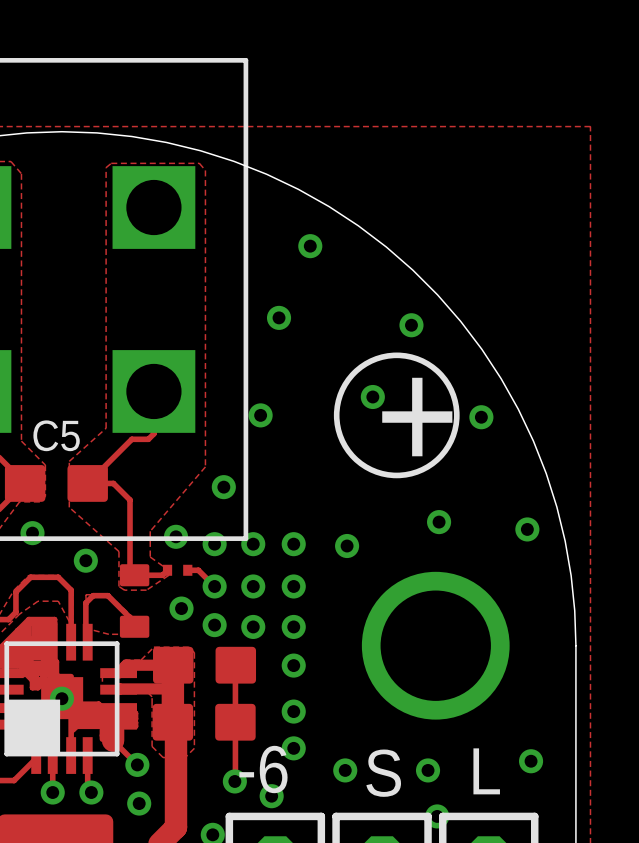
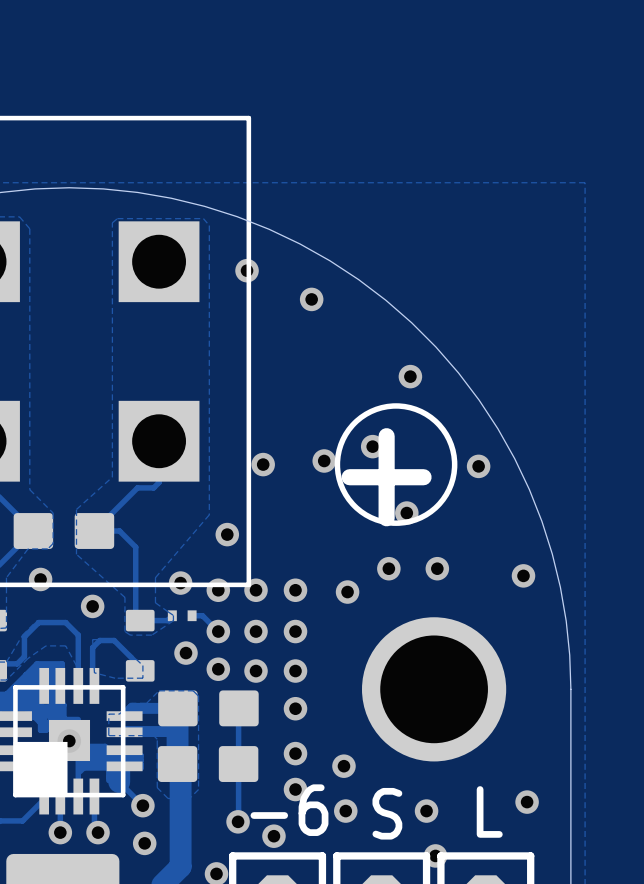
via: none -> (247, 270)
via: (279, 317) -> none
via: none -> (324, 460)
C5 name: C5 (56, 435) -> none
via: none -> (406, 513)
via: none -> (388, 568)
via: none -> (343, 766)

